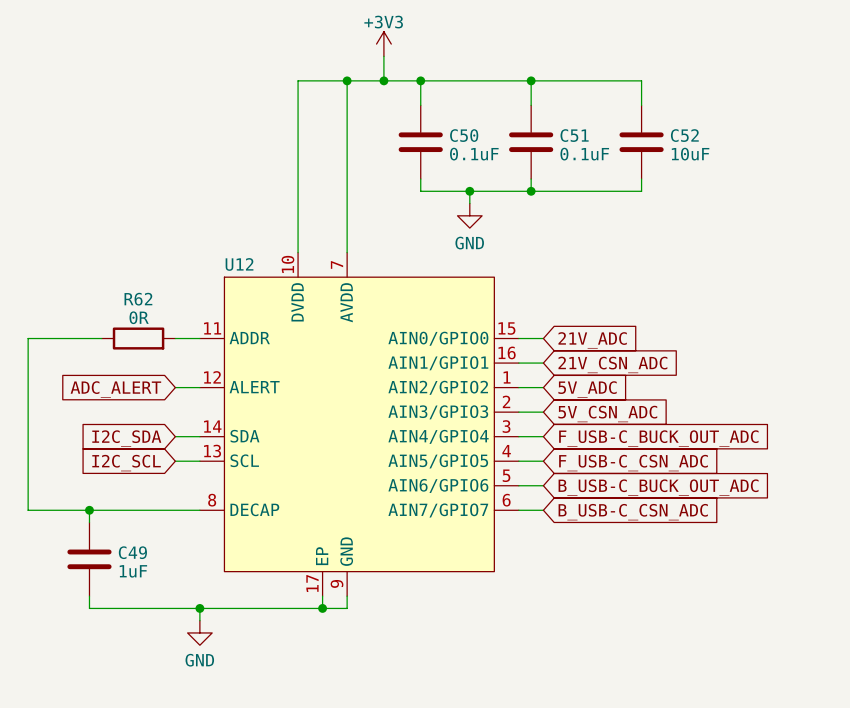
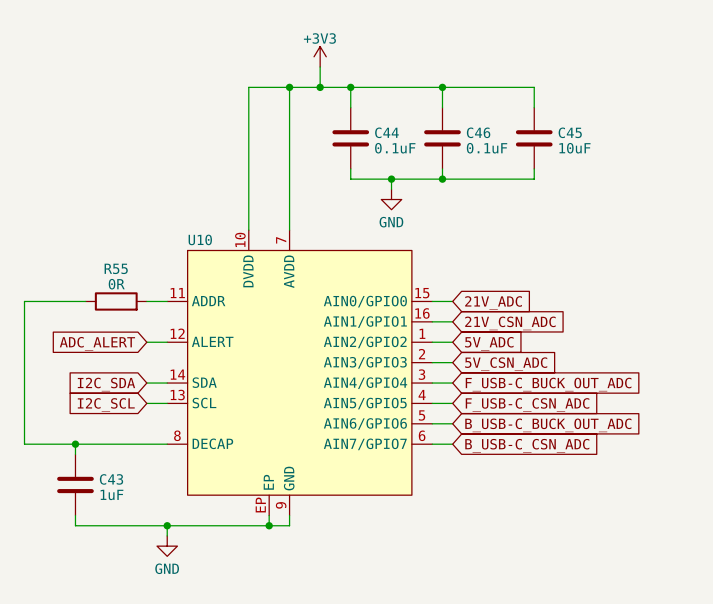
C50 name: C50 (464, 135) -> C44 (386, 132)
C51 name: C51 (574, 135) -> C46 (478, 132)
C52 name: C52 (684, 135) -> C45 (570, 132)
U12 name: U12 (239, 264) -> U10 (200, 239)
R62 name: R62 (138, 299) -> R55 (116, 268)
C49 name: C49 (132, 552) -> C43 (111, 479)
U12 pin number: 17 (312, 583) -> EP (260, 505)

